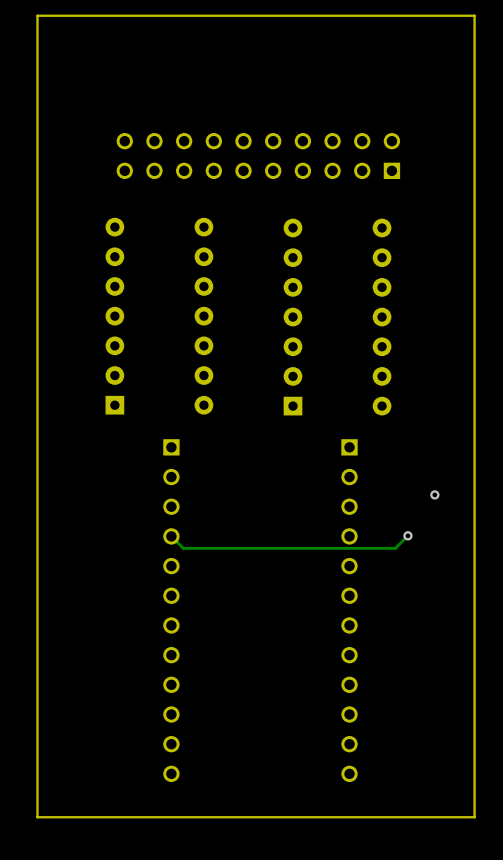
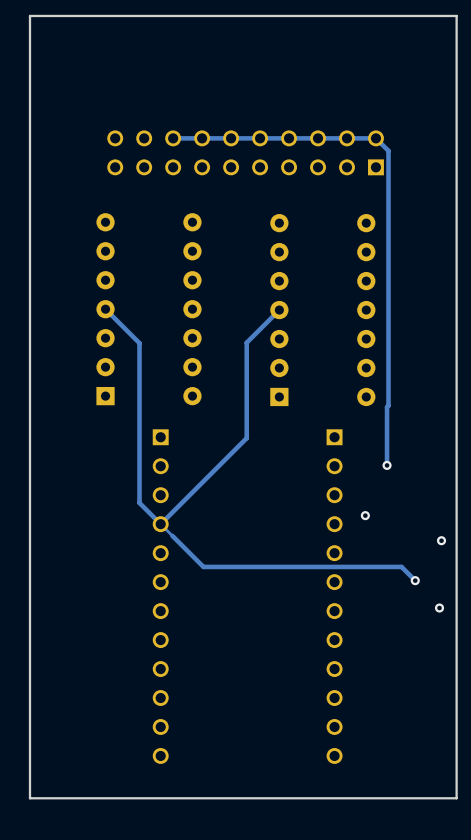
track: none -> (173, 138) (375, 138) (388, 150) (387, 465)
track: none -> (105, 309) (139, 343) (139, 502) (160, 524) (246, 438) (246, 342) (279, 310)
via: none -> (387, 465)
via: (434, 494) -> none
via: none -> (365, 515)
track: (407, 535) (395, 548) (183, 548) -> (415, 580) (401, 566) (203, 566) (172, 535)
via: (407, 535) -> none
via: none -> (441, 540)
via: none -> (415, 580)
via: none -> (439, 608)

